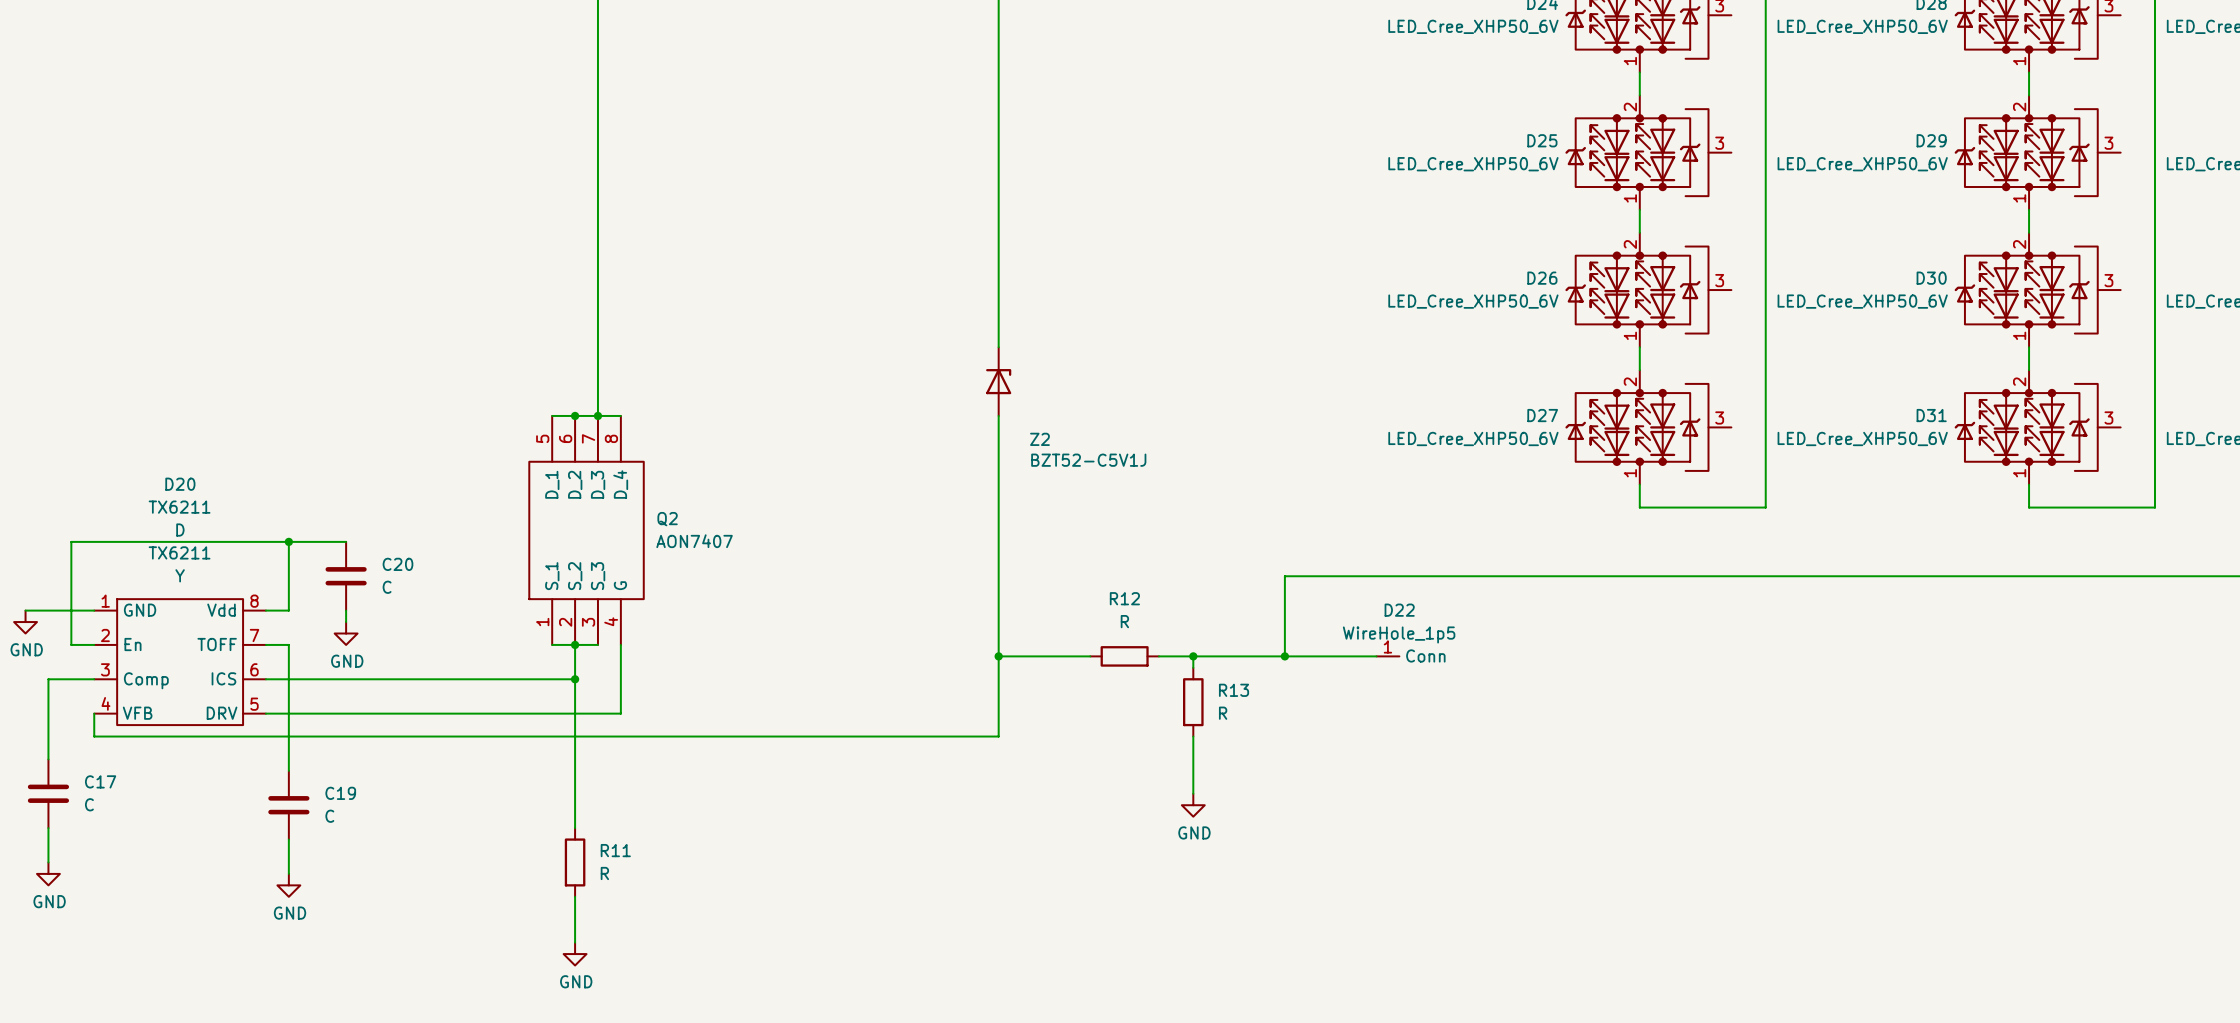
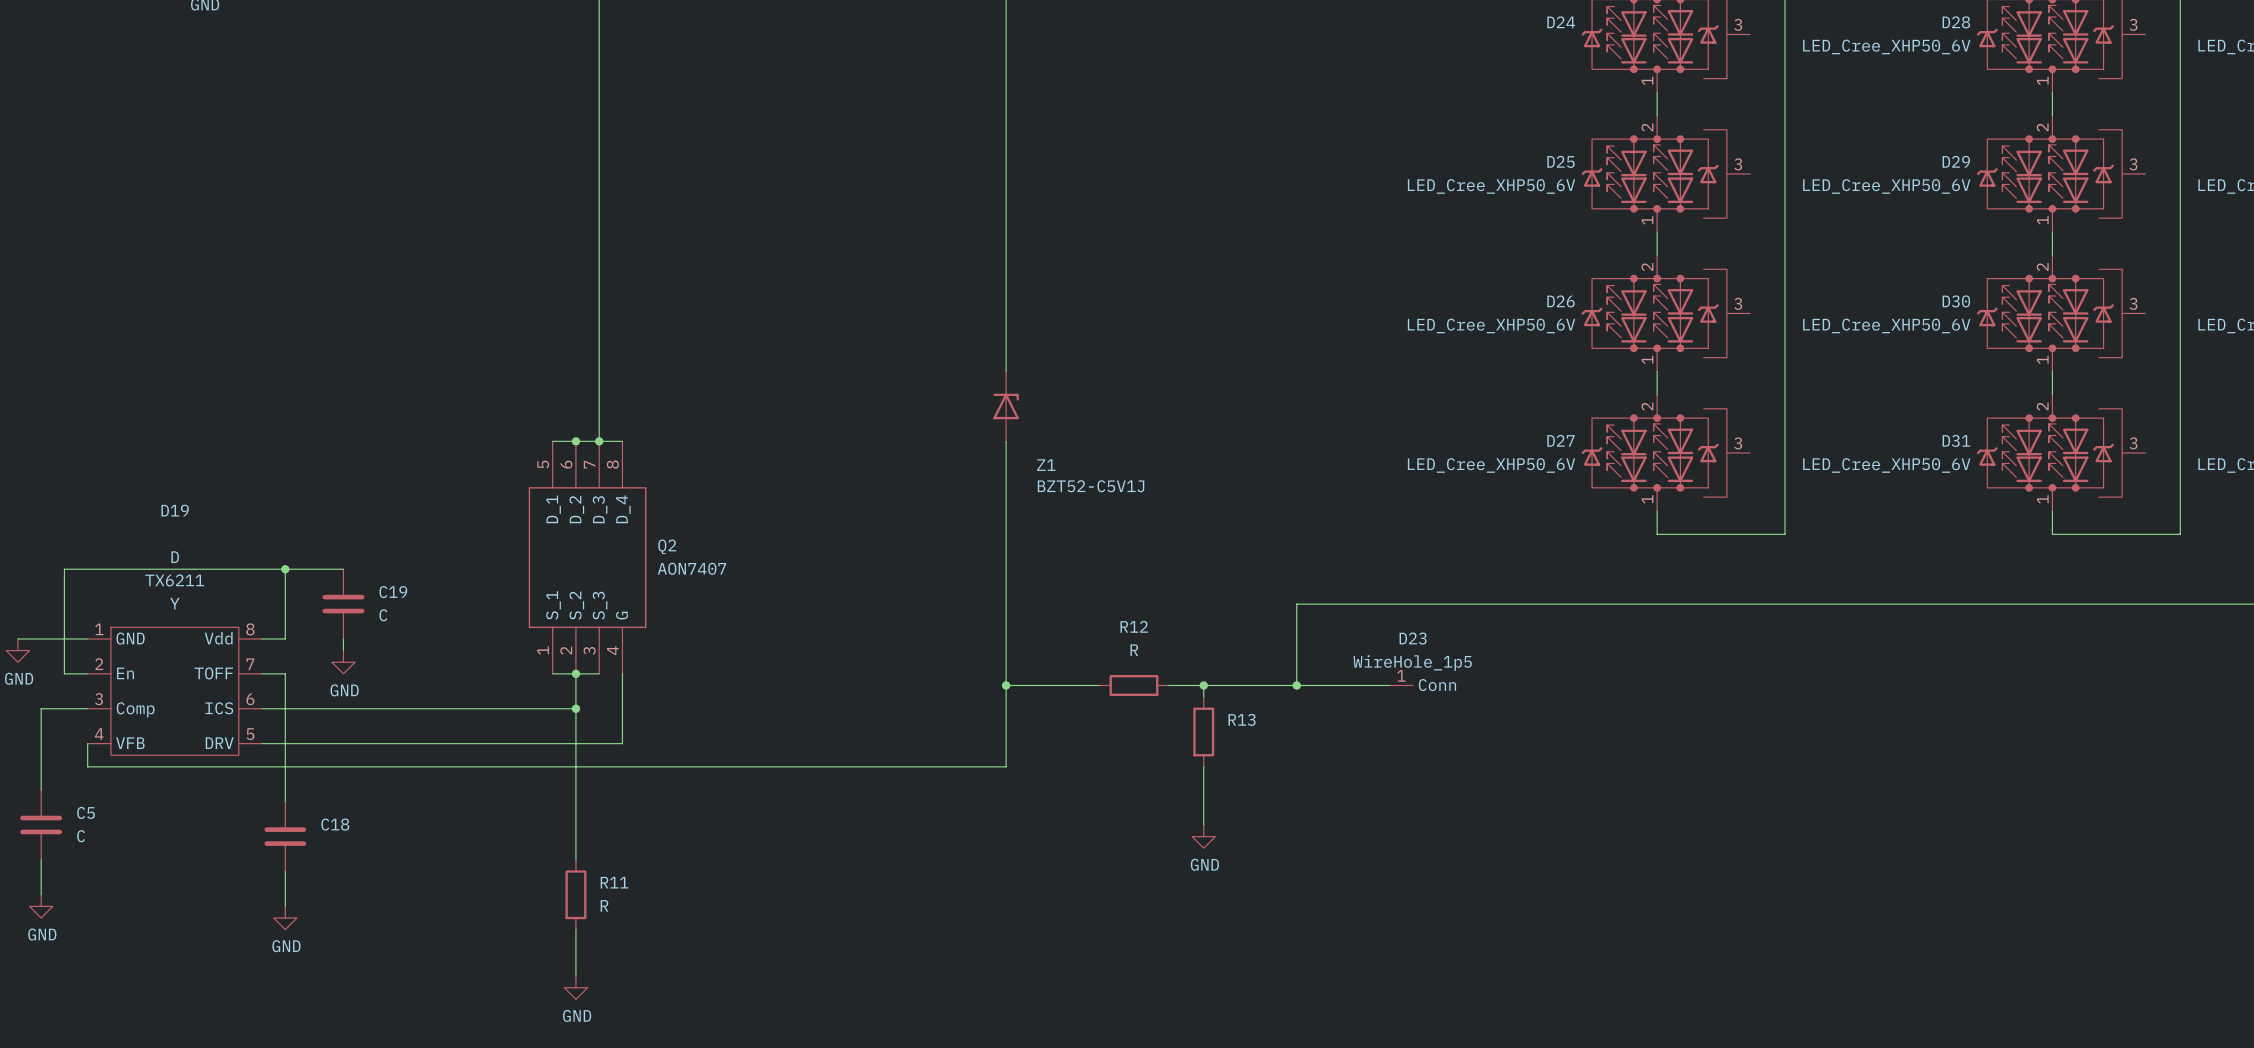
D24 value: LED_Cree_XHP50_6V (1473, 26) -> none
Z2 name: Z2 (1039, 439) -> Z1 (1046, 465)
D20 name: D20 (180, 484) -> D19 (175, 510)
D20 value: TX6211 (179, 507) -> none
C20 name: C20 (397, 564) -> C19 (393, 592)
D22 name: D22 (1399, 610) -> D23 (1413, 638)
R13 value: R (1223, 713) -> none
C17 name: C17 (100, 781) -> C5 (86, 812)
C19 name: C19 (340, 793) -> C18 (335, 824)
C19 value: C (329, 816) -> none

